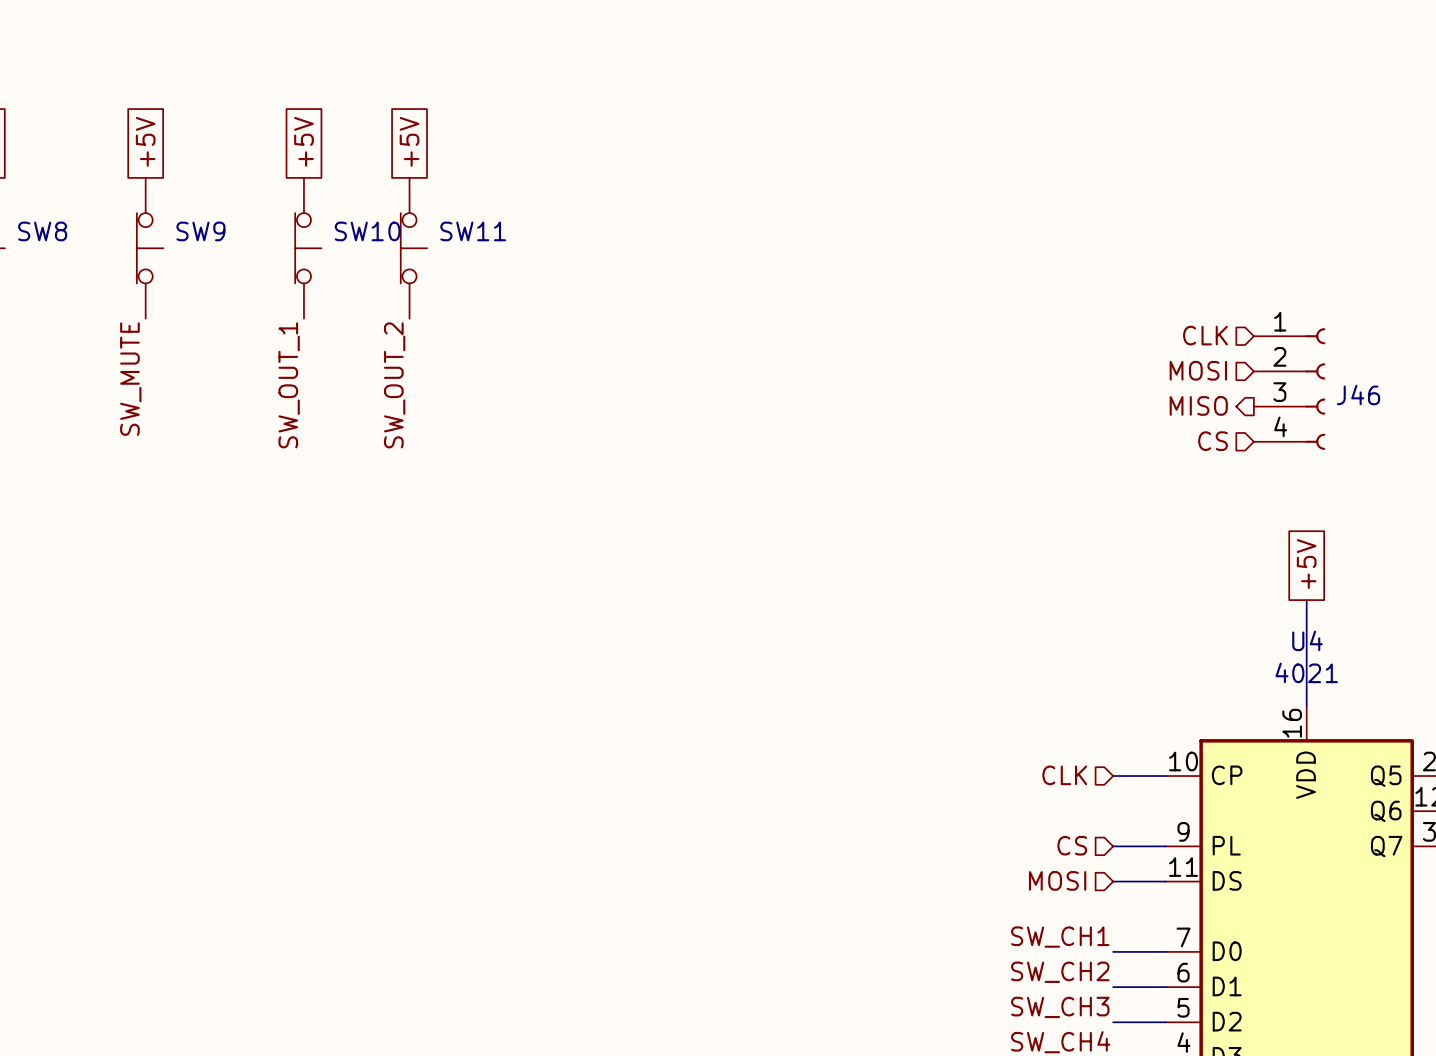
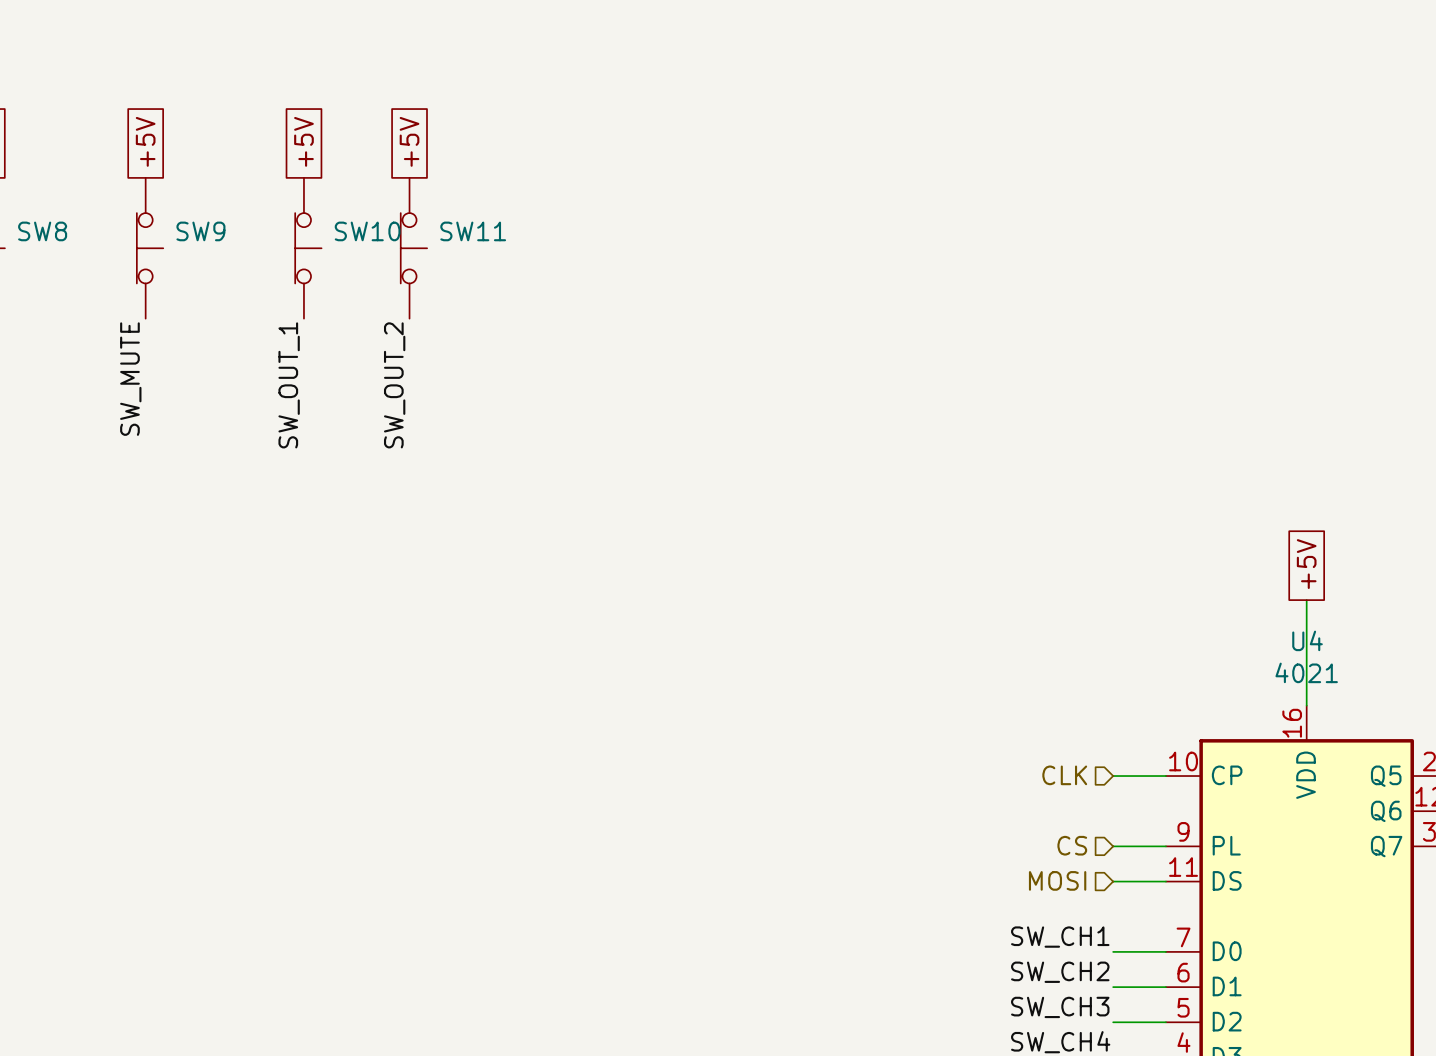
hierarchical label: CLK (1205, 335) -> none
hierarchical label: MOSI (1198, 370) -> none
J46: (1289, 389) -> none
hierarchical label: MISO (1198, 405) -> none
hierarchical label: CS (1213, 441) -> none

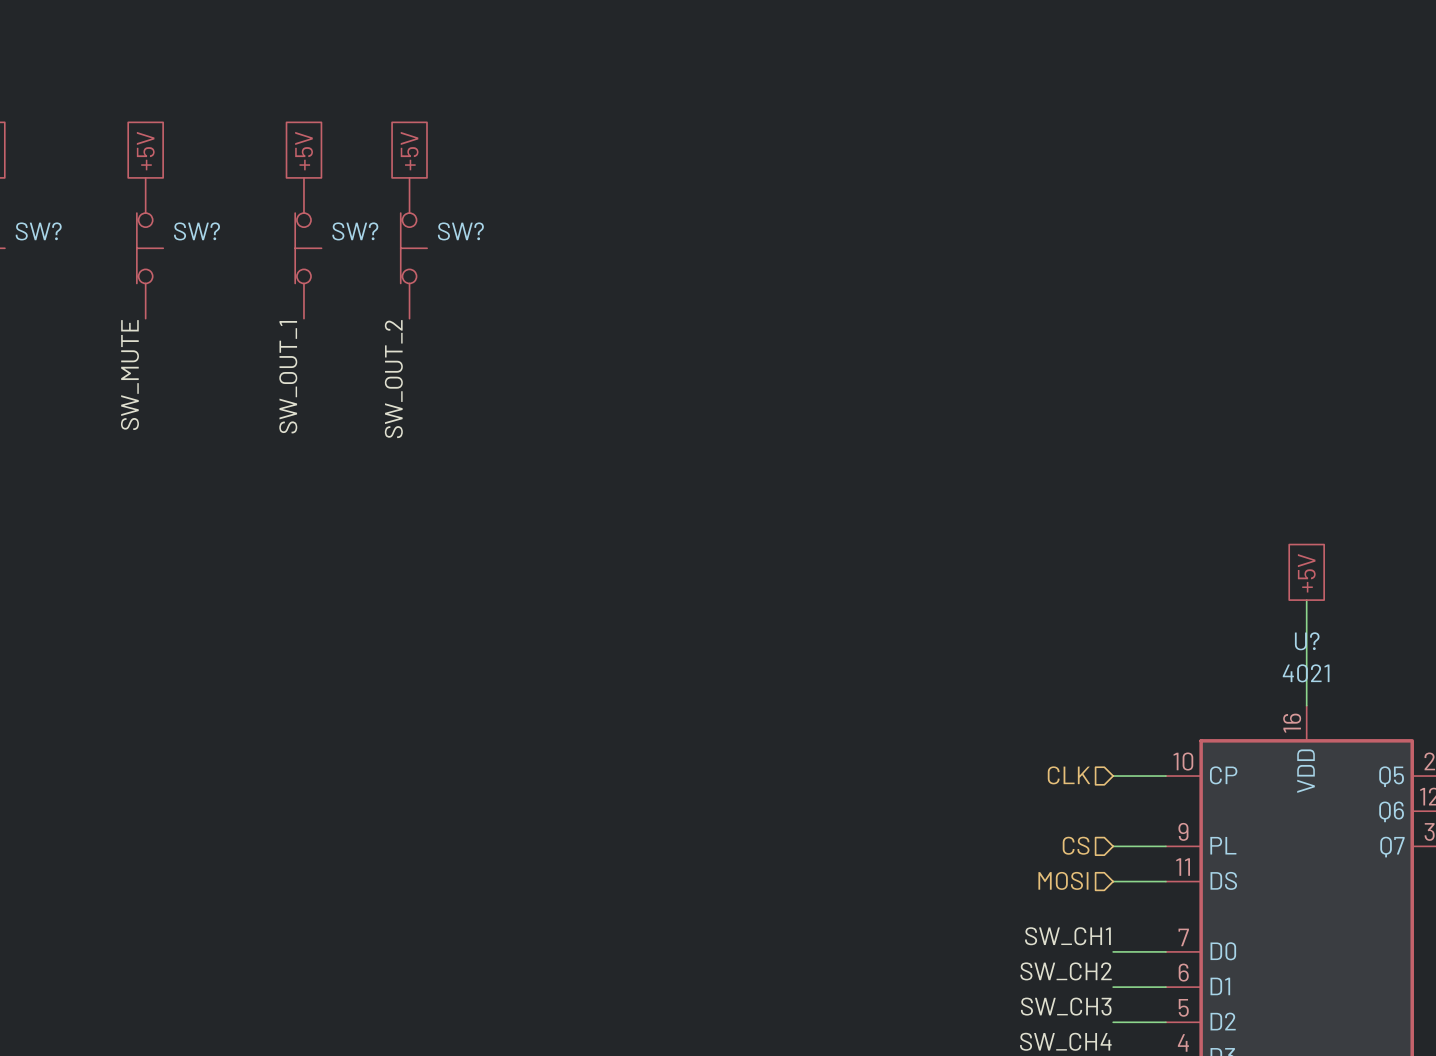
SW8 name: SW8 (42, 231) -> SW? (38, 231)
SW9 name: SW9 (200, 231) -> SW? (197, 231)
SW10 name: SW10 (367, 231) -> SW? (355, 231)
SW11 name: SW11 (473, 231) -> SW? (460, 231)
U4 name: U4 (1307, 640) -> U? (1307, 641)

